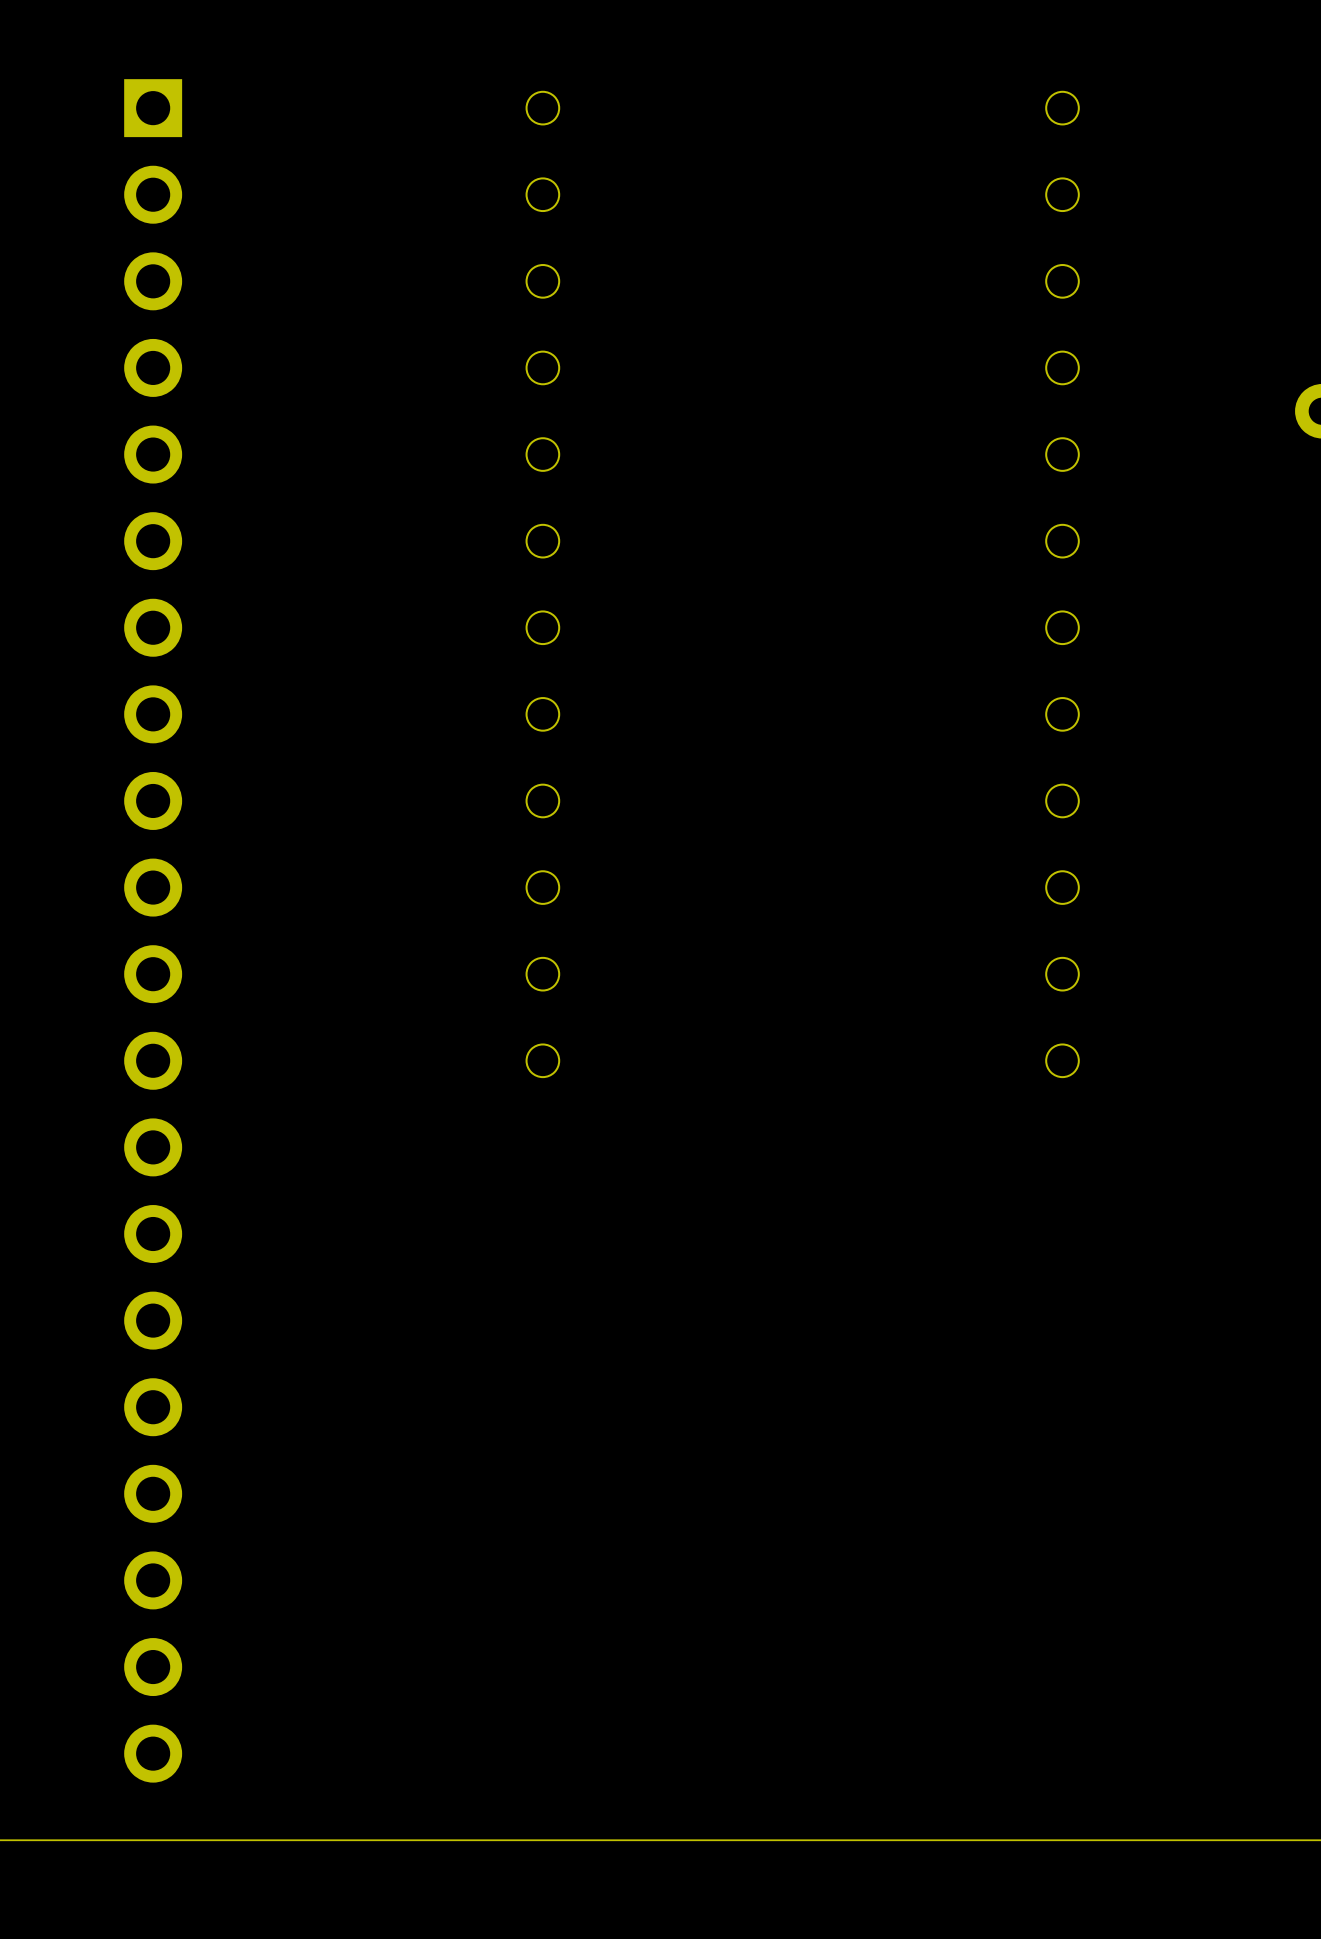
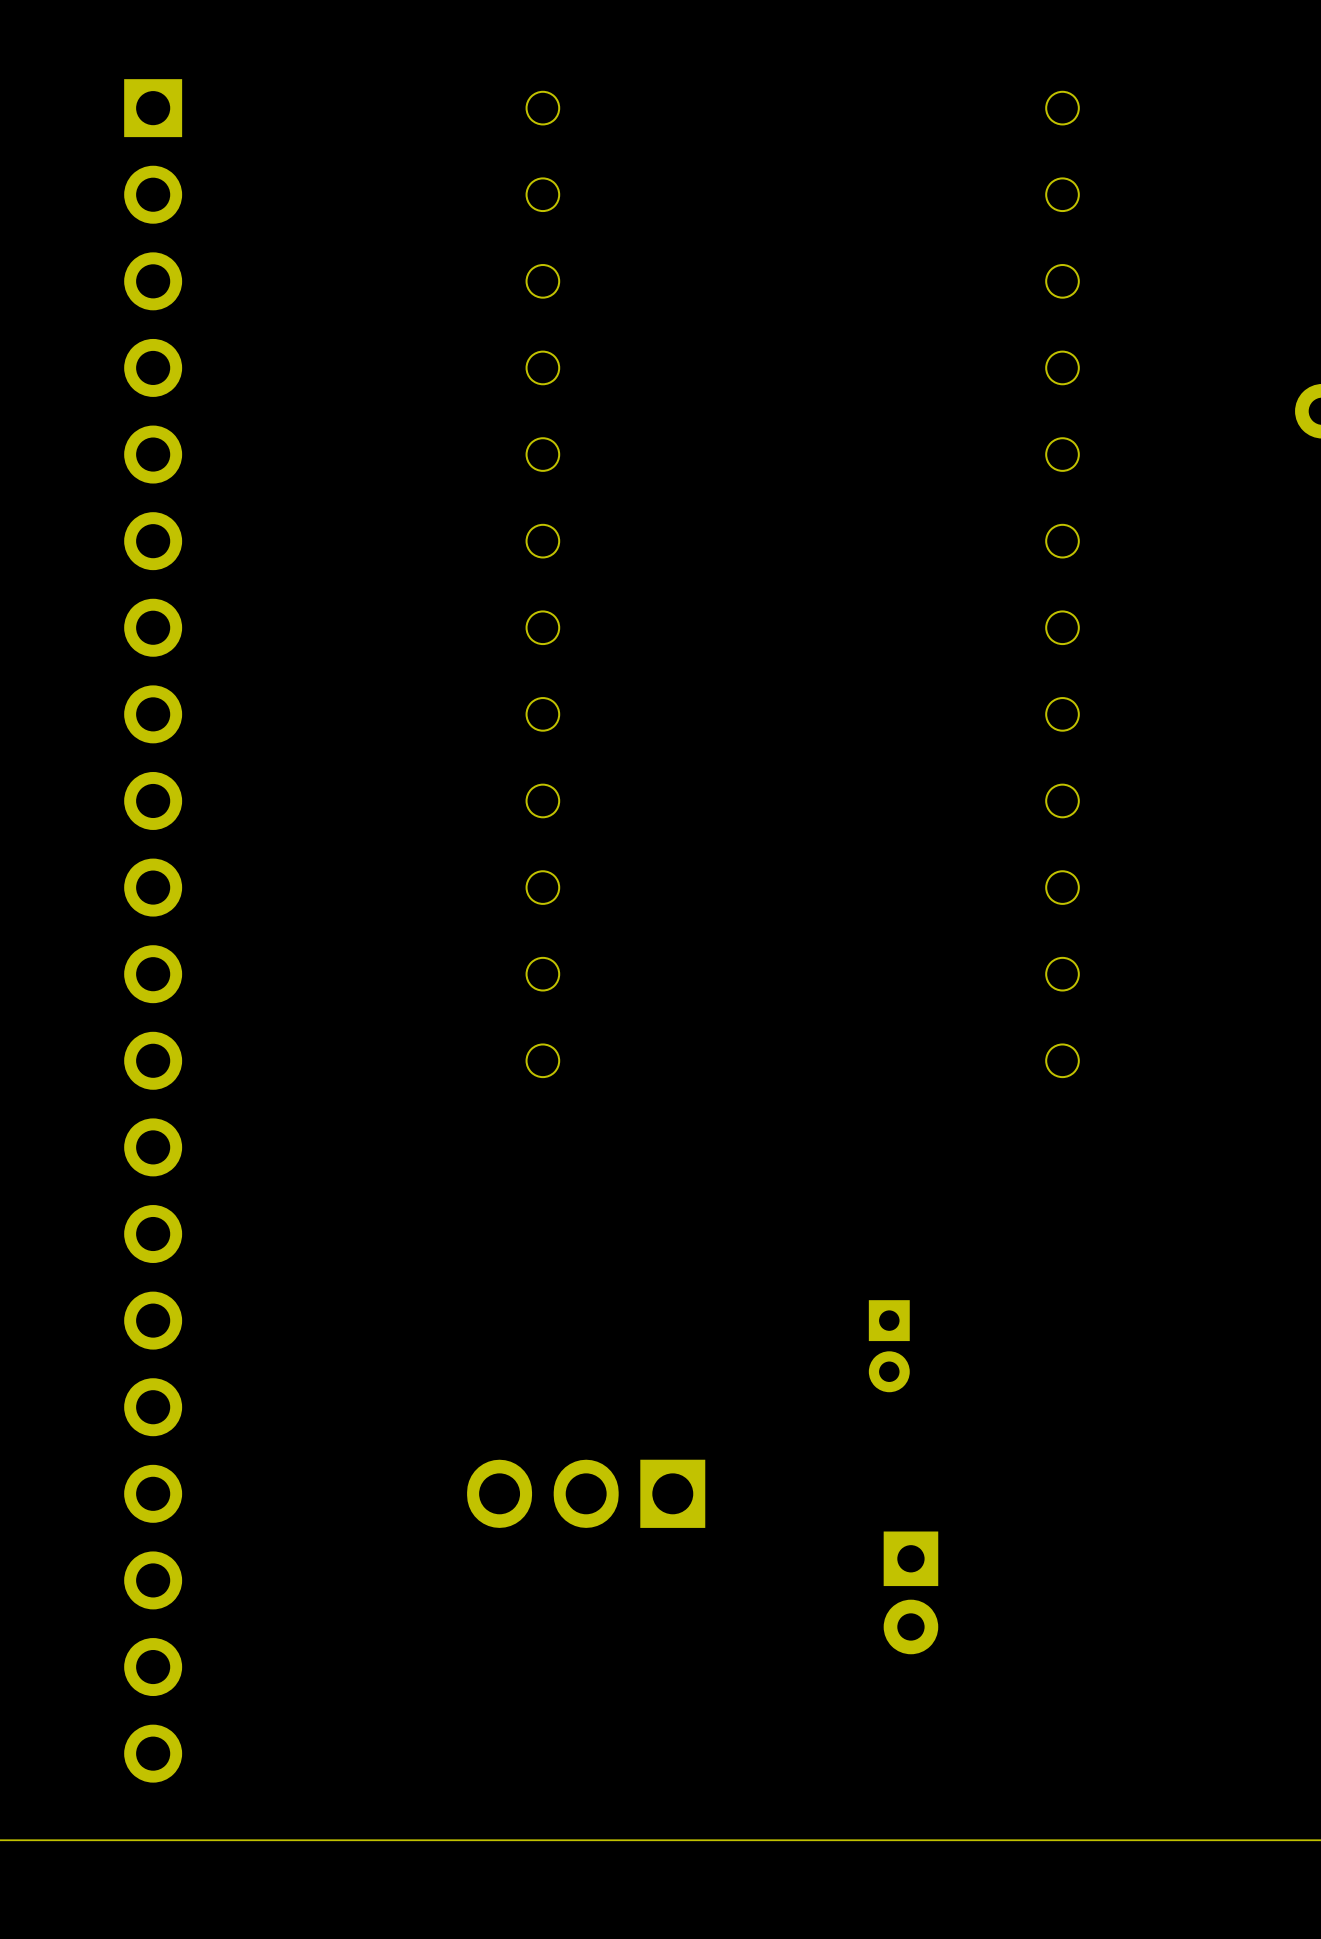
part: none -> (889, 1346)
part: none -> (586, 1493)
part: none -> (910, 1592)

